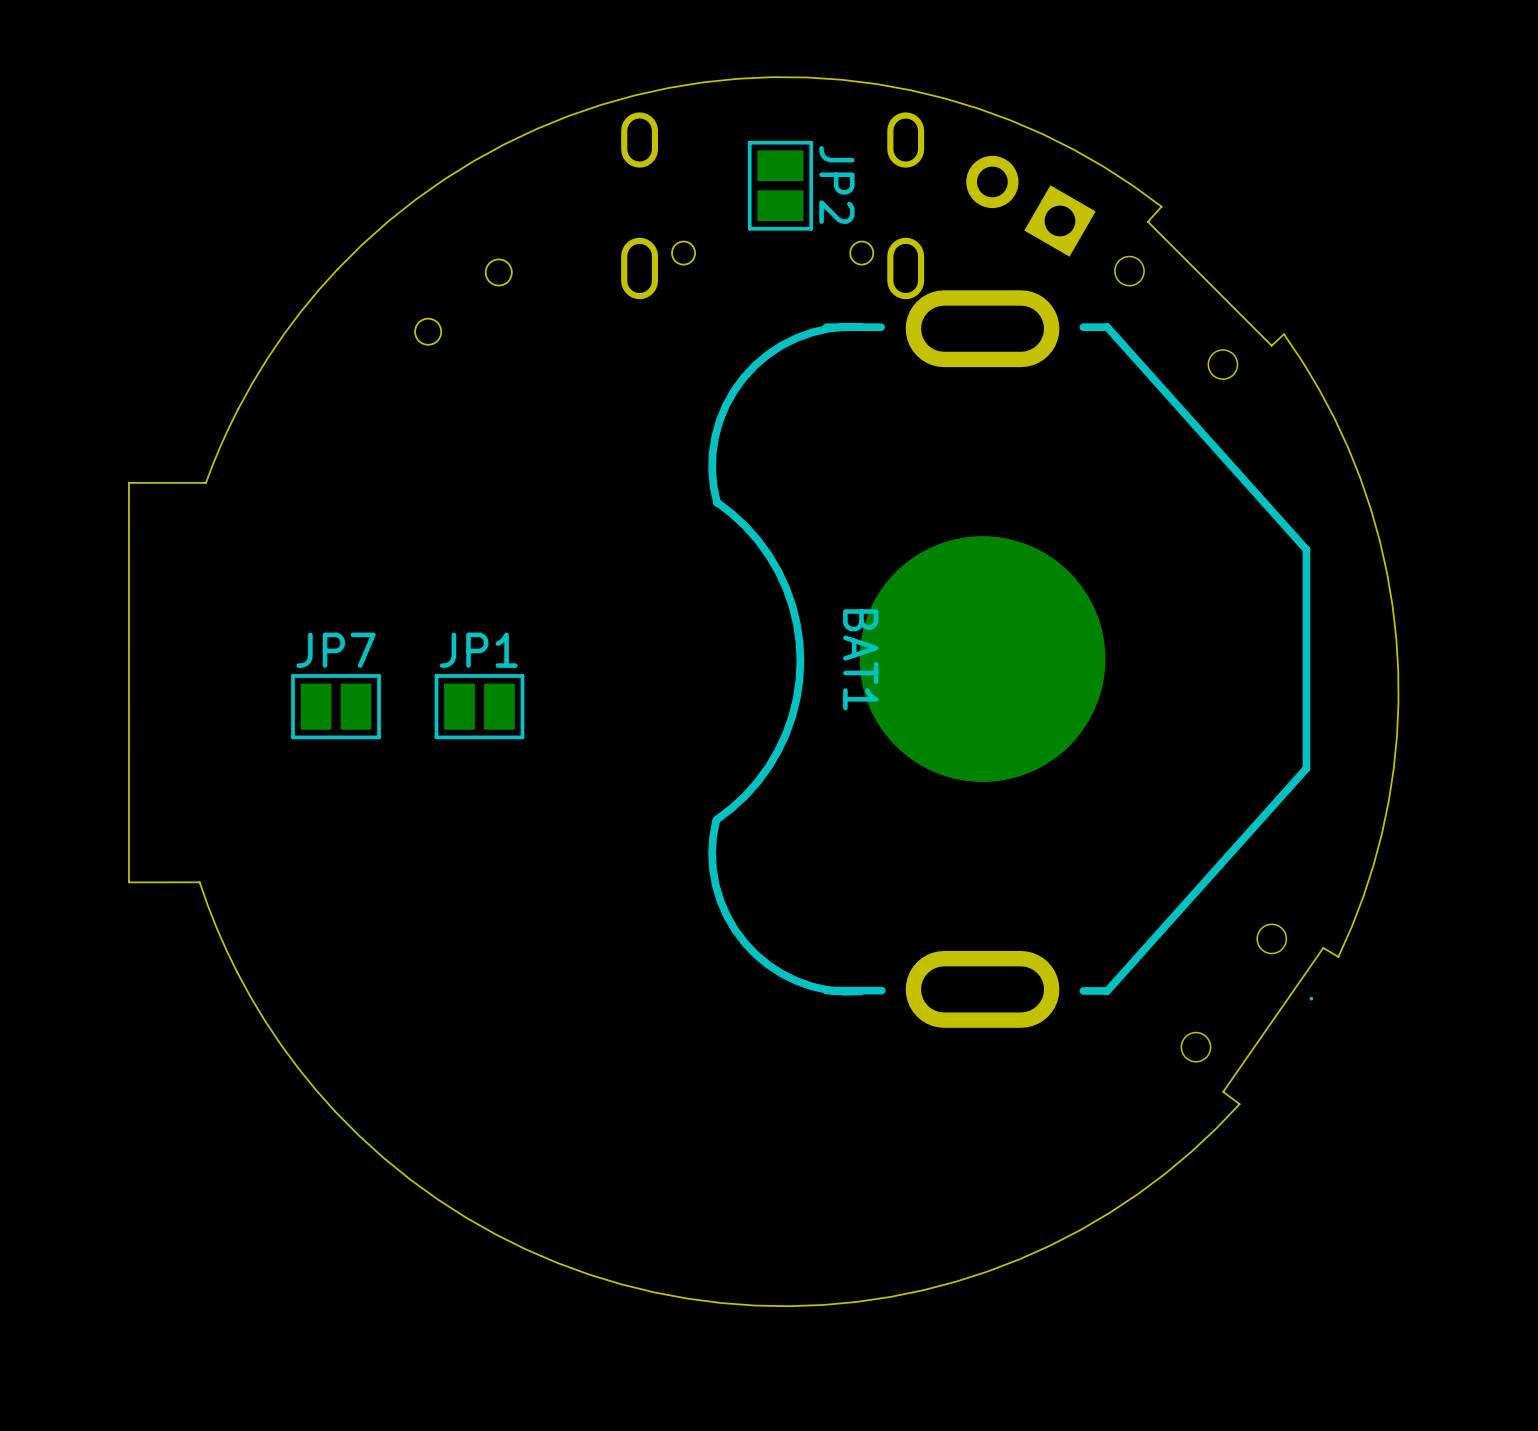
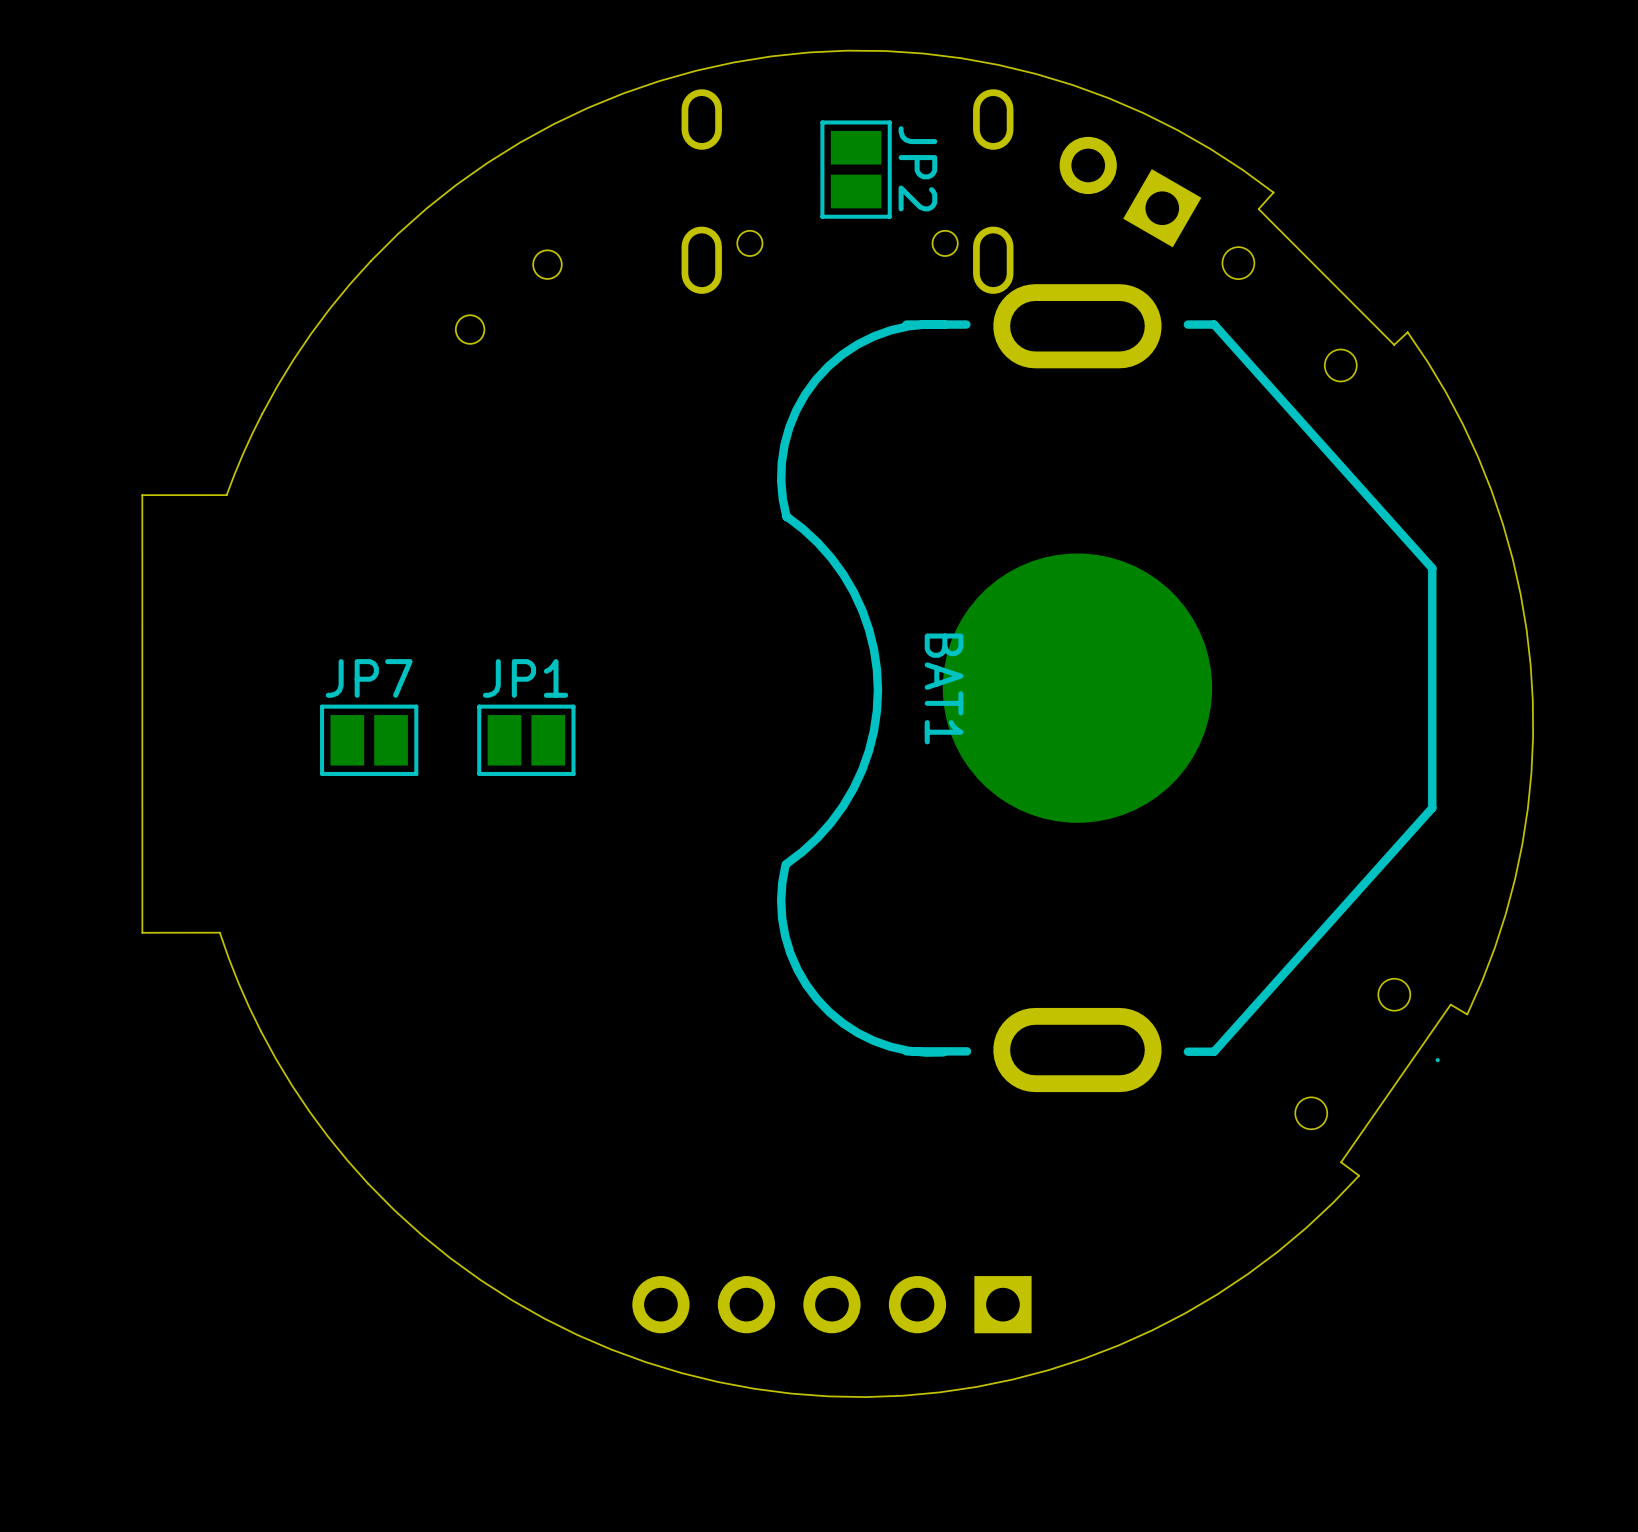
part: none -> (831, 1304)

